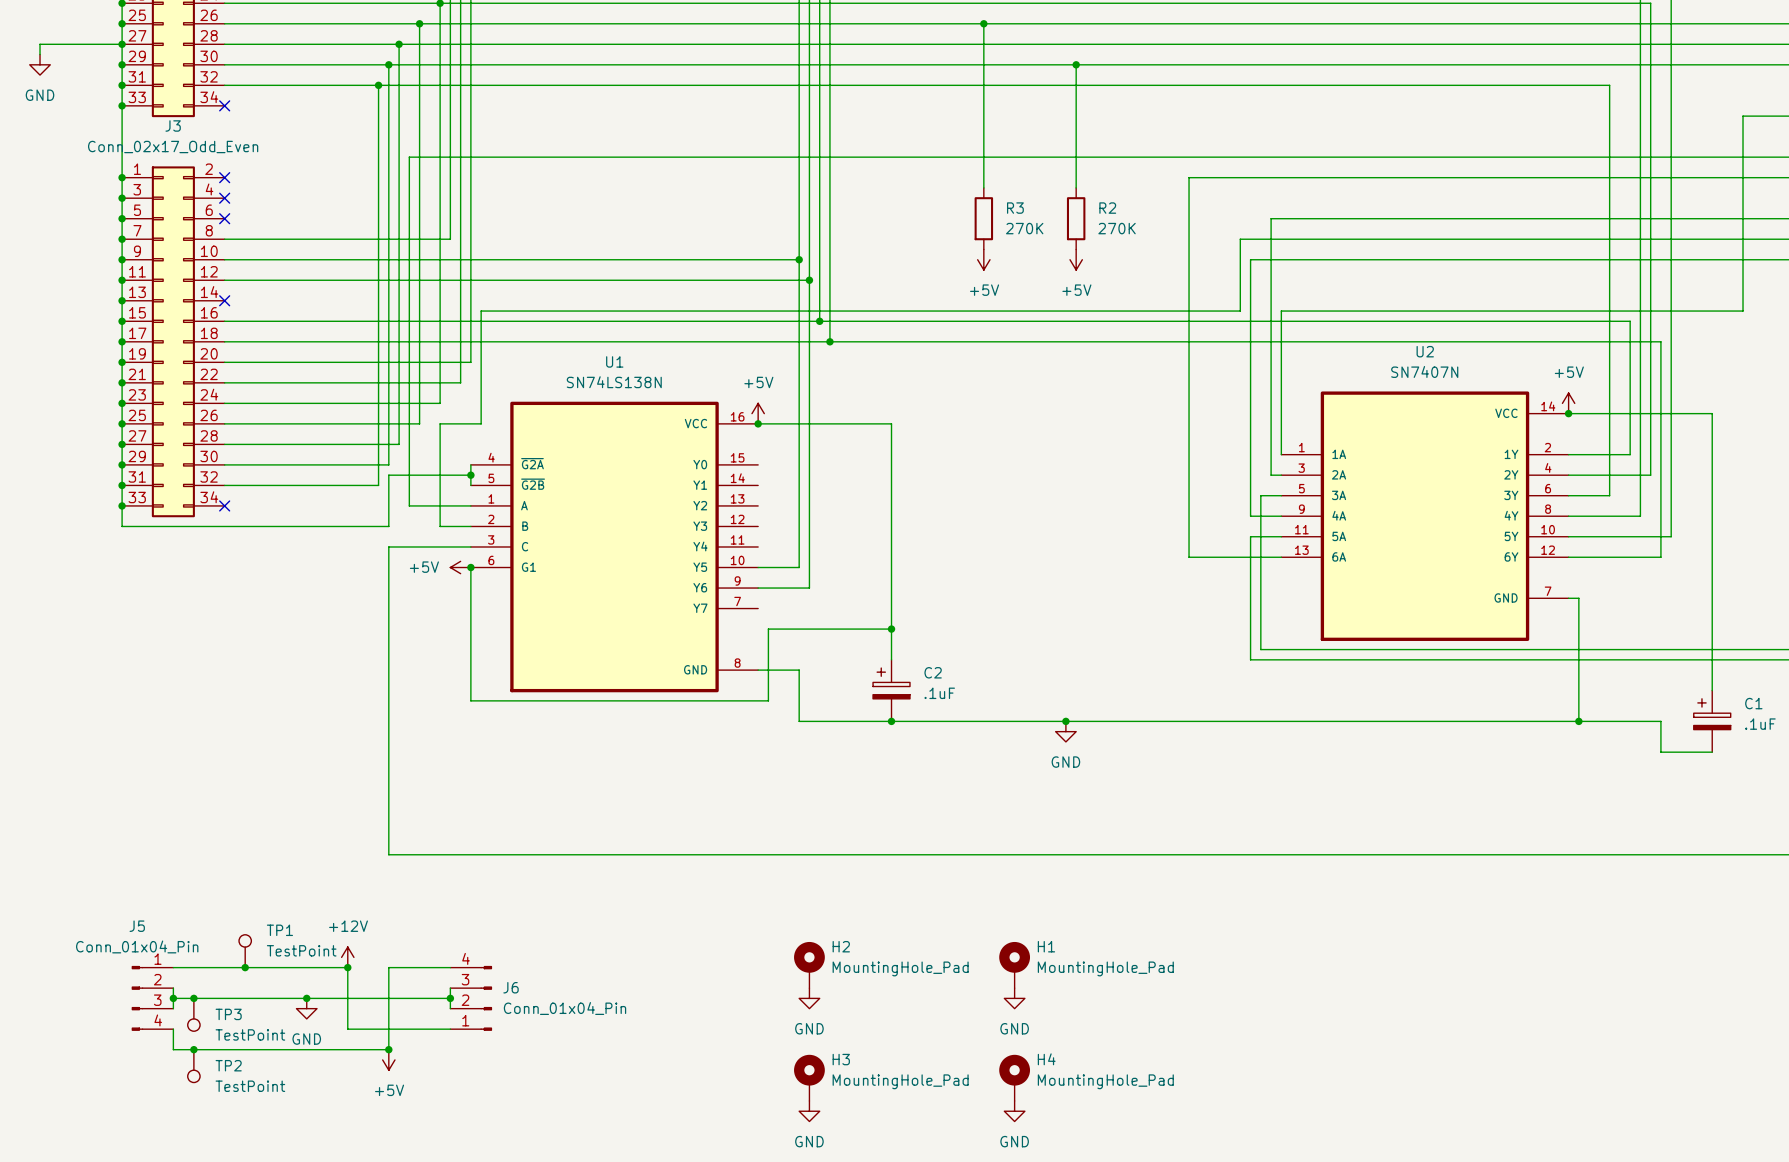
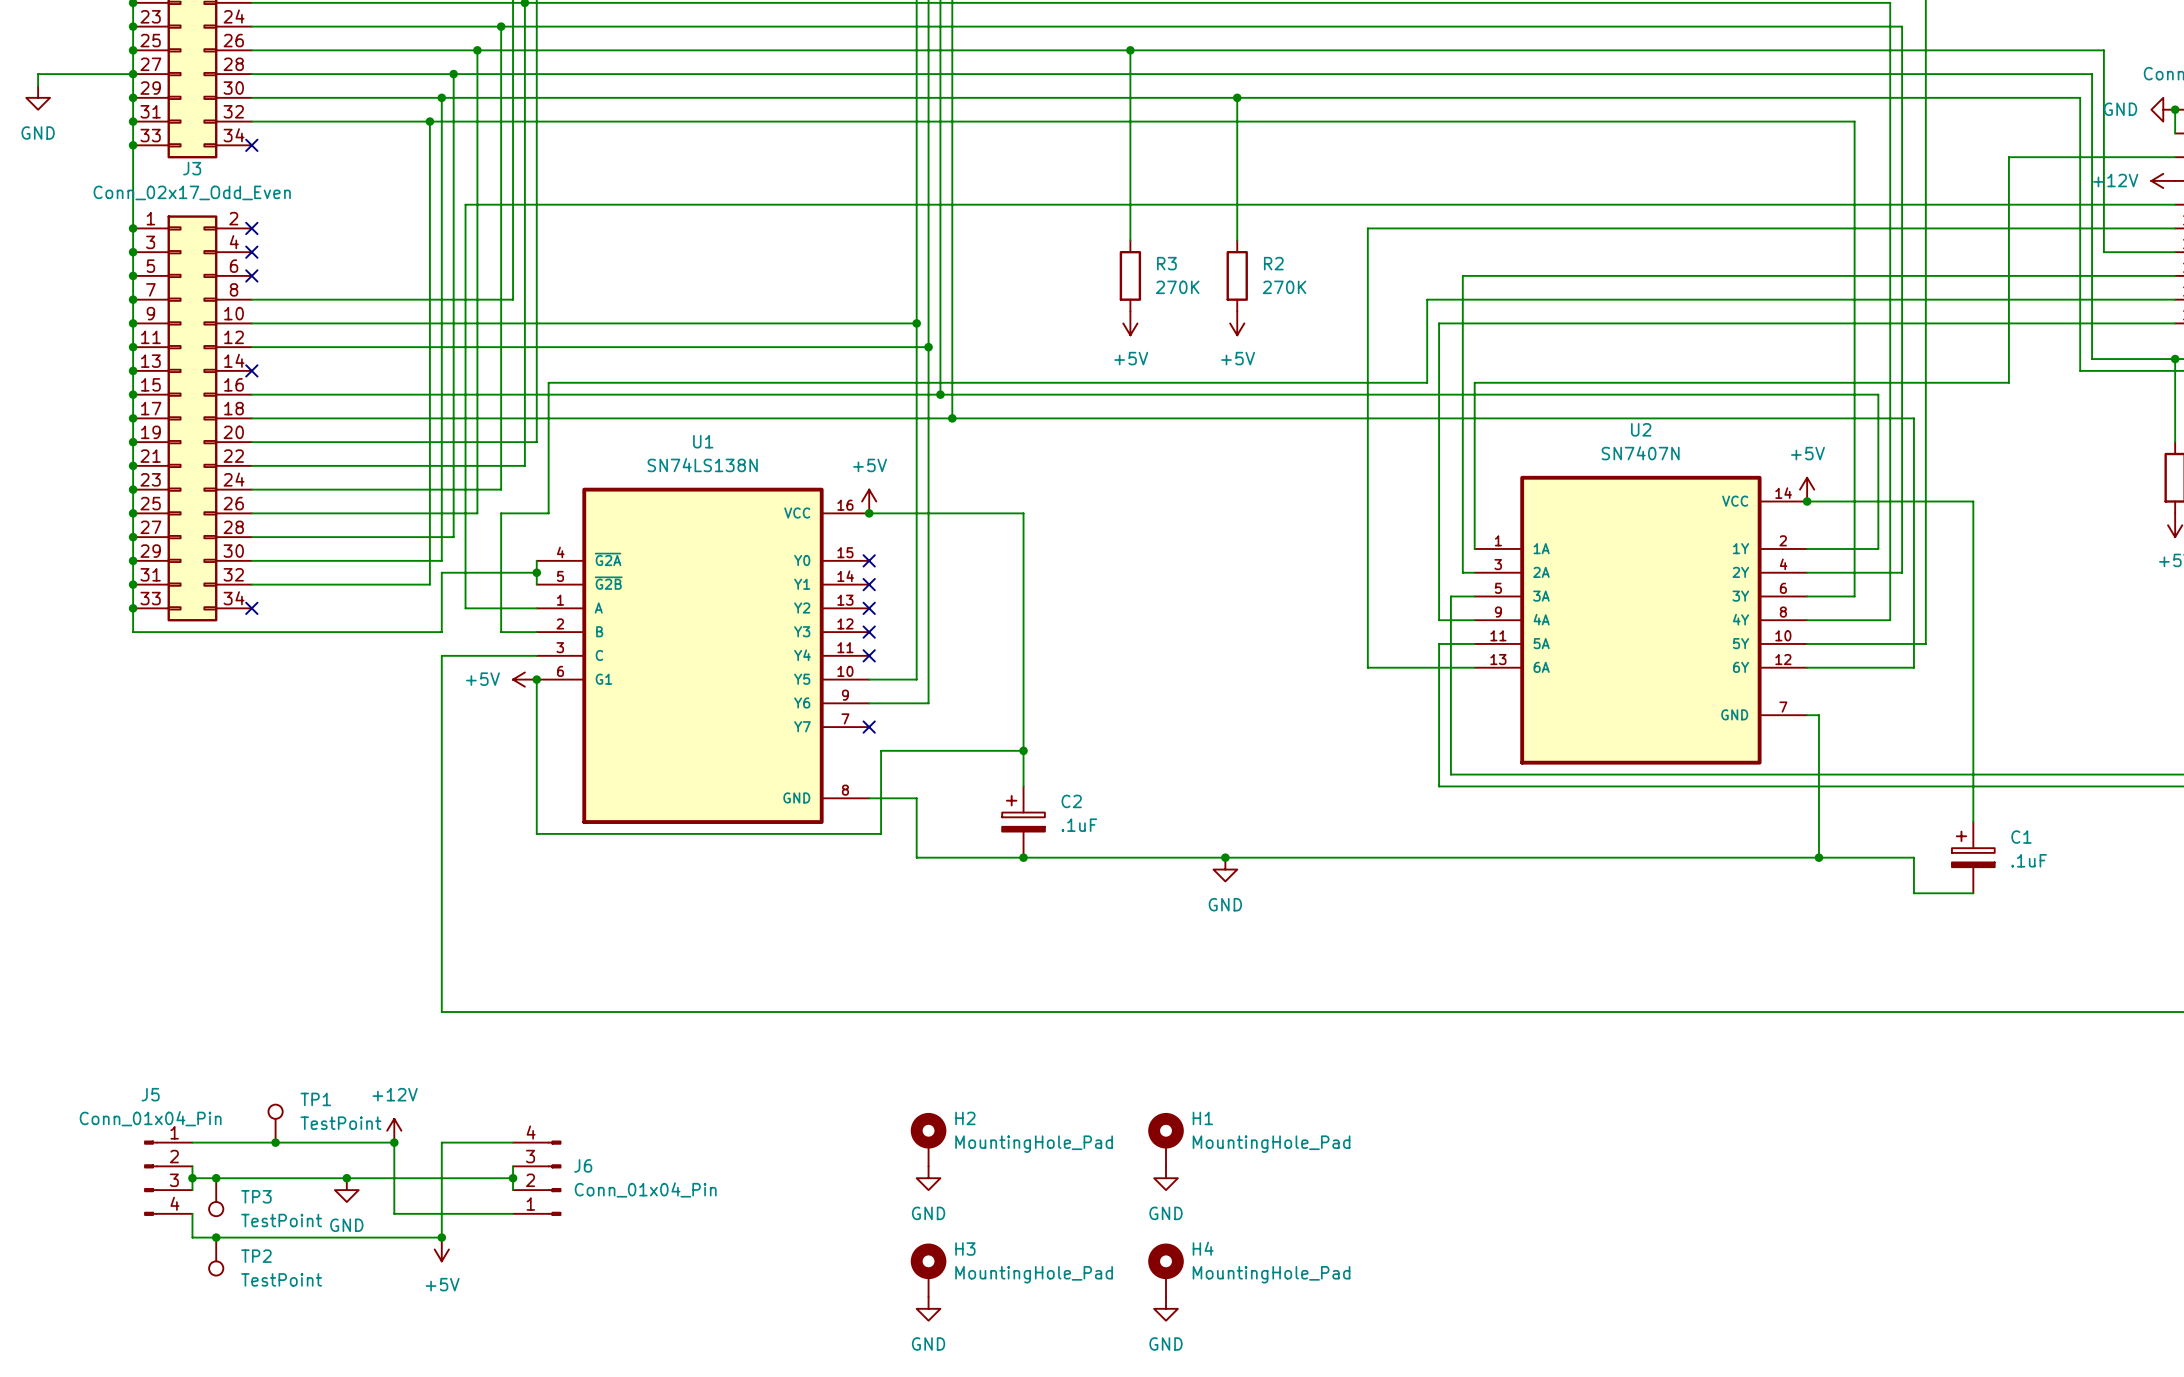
no-connect mark: none -> (869, 560)
no-connect mark: none -> (869, 584)
no-connect mark: none -> (869, 608)
no-connect mark: none -> (869, 632)
no-connect mark: none -> (869, 655)
no-connect mark: none -> (869, 727)

